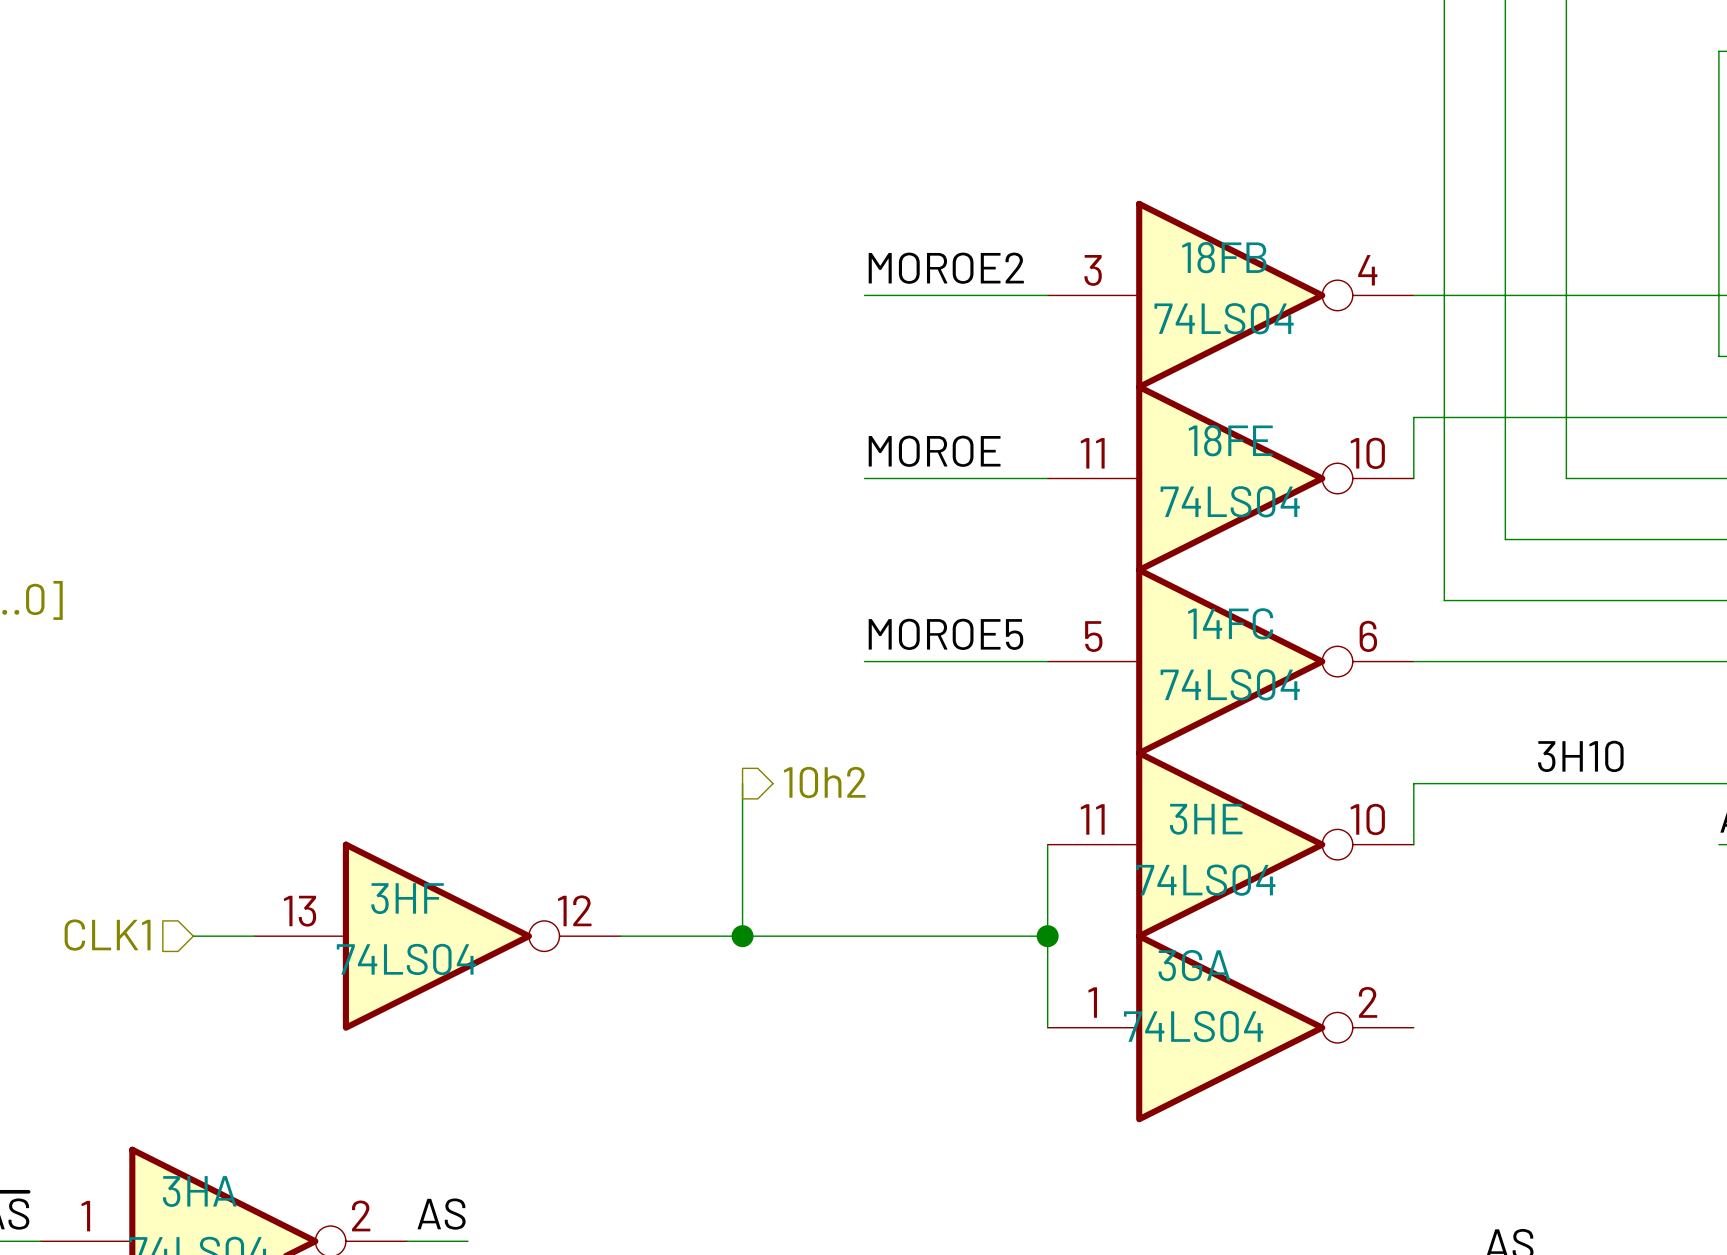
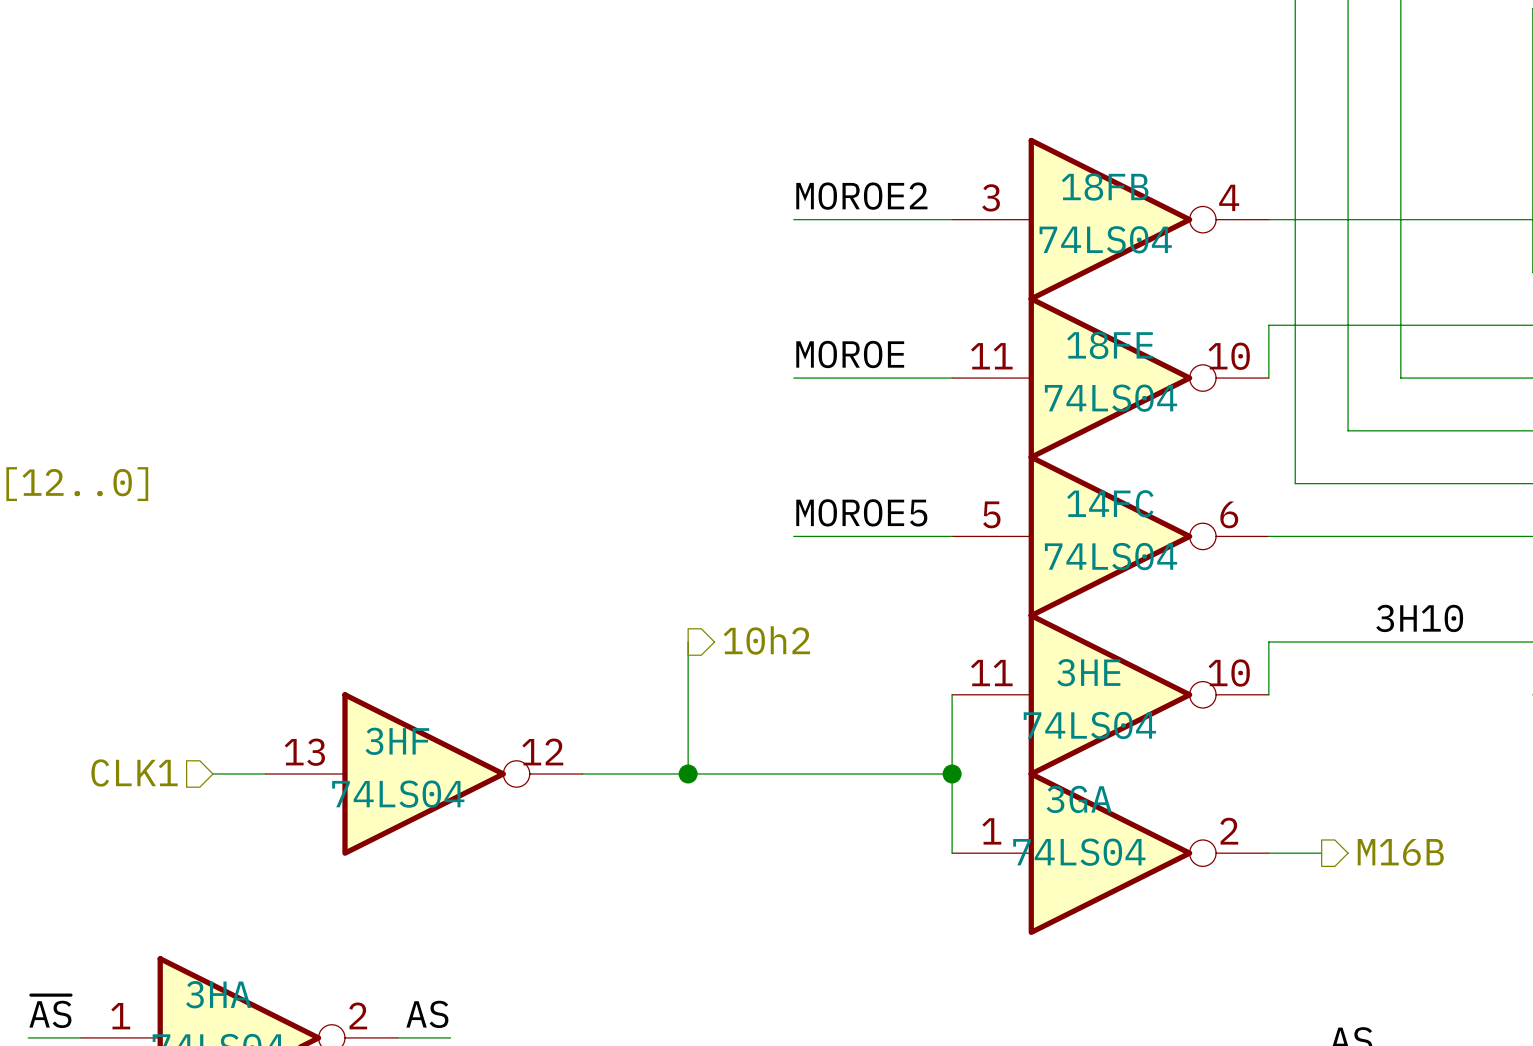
hierarchical label: none -> M16B (1400, 852)
wire: none -> (1268, 853) (1321, 853)

